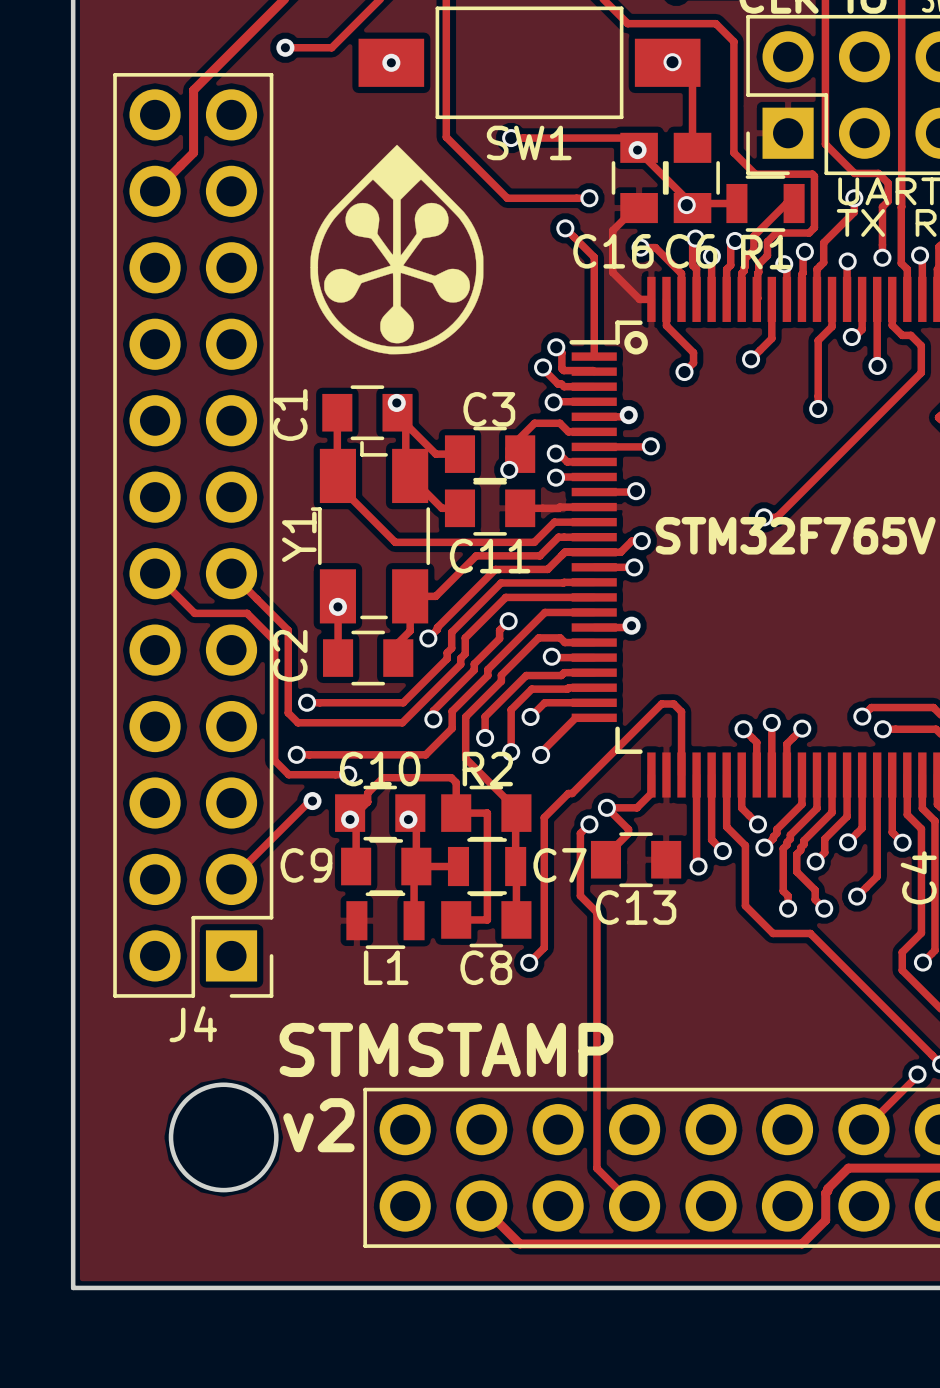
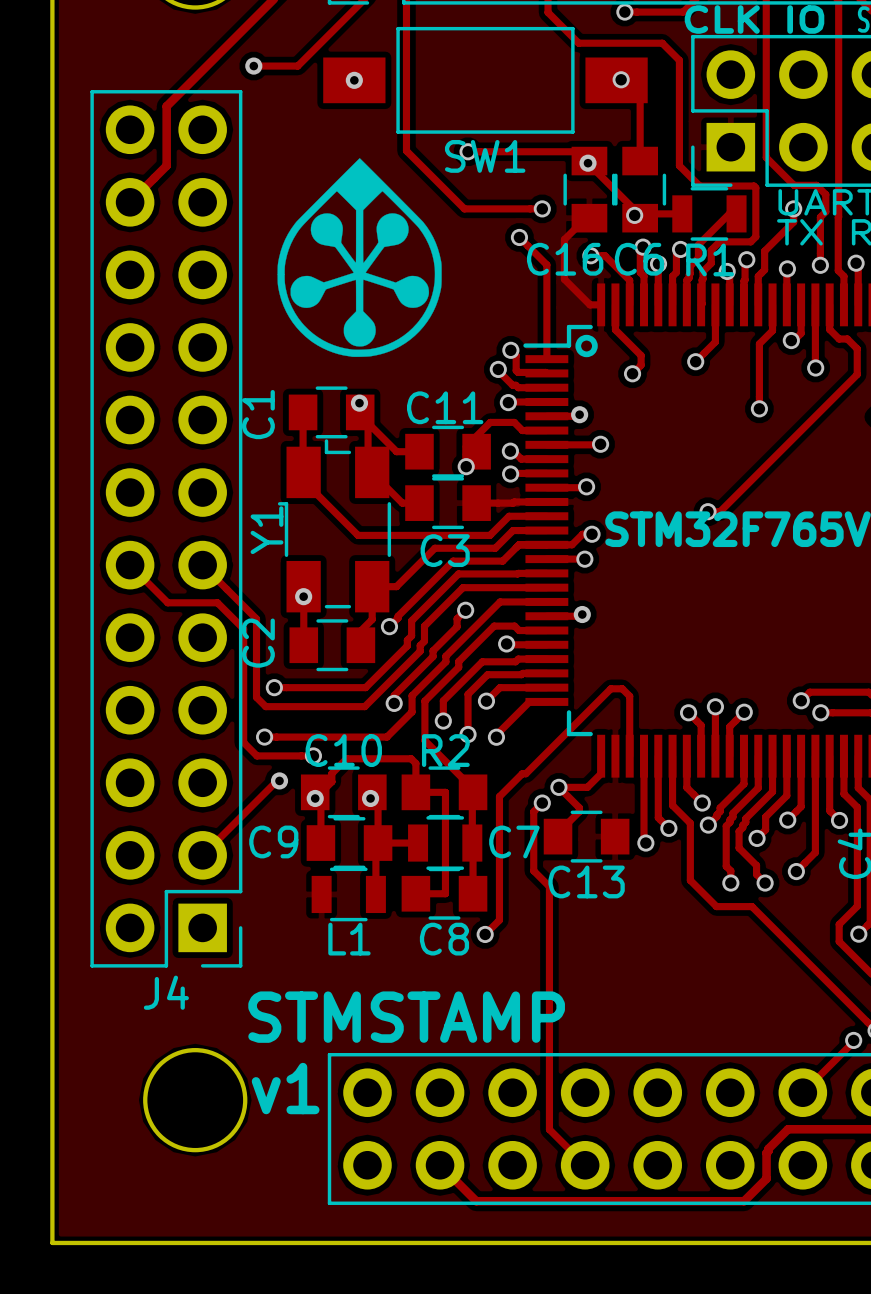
C3 name position: C3 (489, 409) -> C3 (445, 550)
C11 name position: C11 (490, 556) -> C11 (445, 407)
text: v2 (318, 1125) -> v1 (285, 1088)

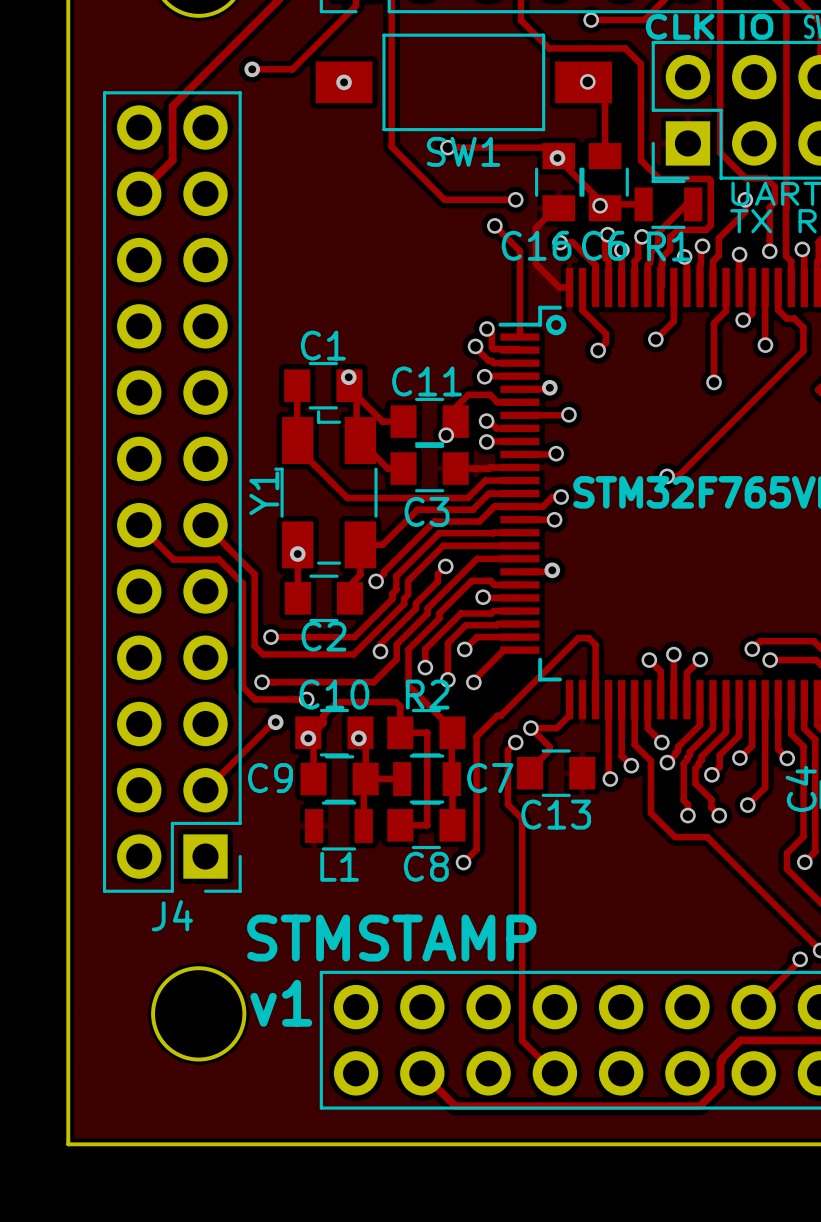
drawing: [277, 158, 442, 357] -> none
C1 name rotation: 0° (258, 414) -> 90° clockwise (323, 345)
C1 name position: C1 (258, 414) -> C1 (323, 345)
C2 name rotation: 0° (258, 643) -> 90° clockwise (323, 636)
C2 name position: C2 (258, 643) -> C2 (323, 636)

